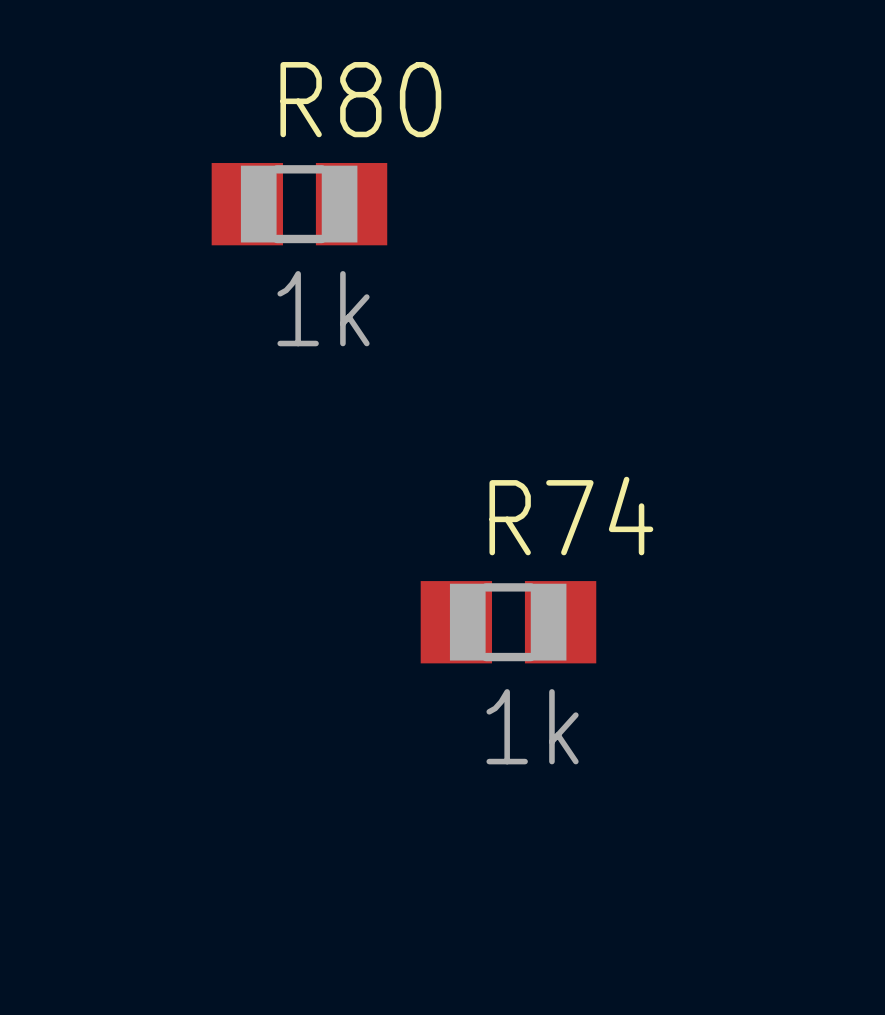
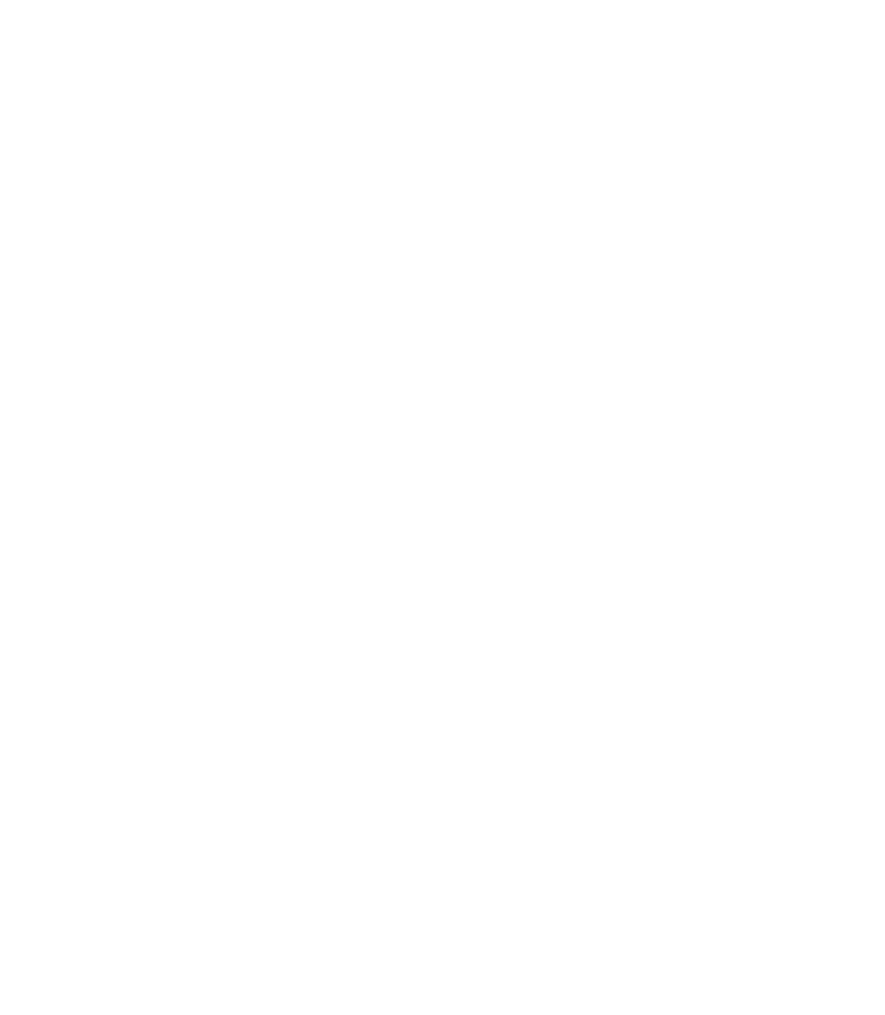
R80: 1k (299, 204) -> none
R74: 1k (508, 622) -> none

